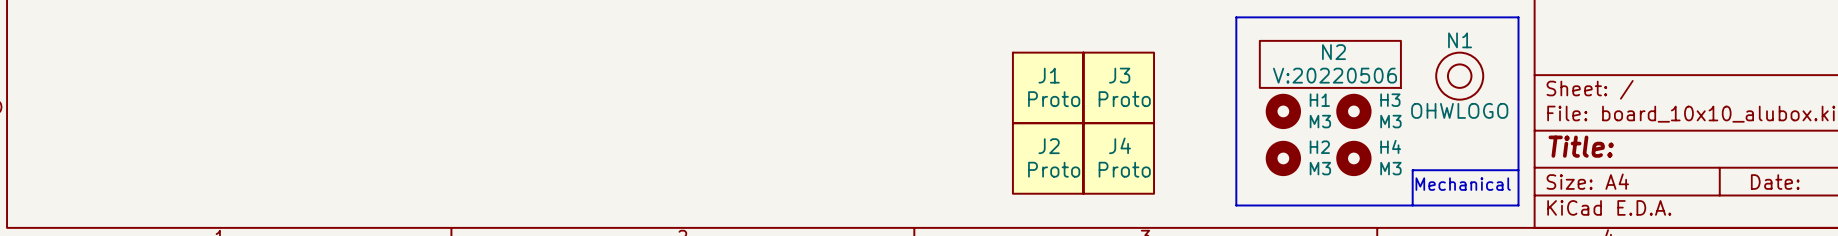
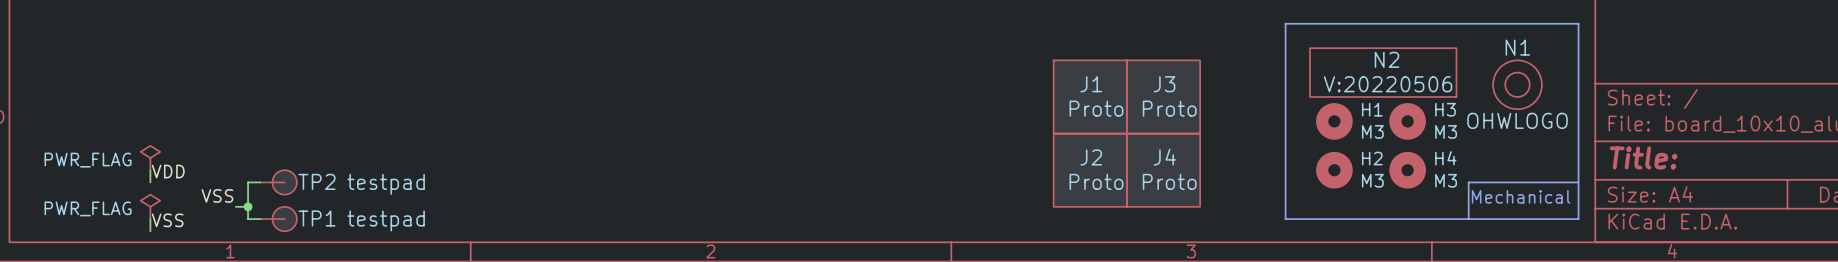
power symbol: none -> PWR_FLAG (150, 158)
wire: none -> (150, 170) (150, 182)
label: none -> VDD (168, 171)
wire: none -> (260, 182) (248, 182) (248, 219) (260, 219)
TP2: none -> testpad (278, 182)
label: none -> VSS (217, 195)
power symbol: none -> PWR_FLAG (150, 206)
wire: none -> (235, 206) (248, 206)
junction: none -> (248, 206)
wire: none -> (150, 219) (150, 231)
TP1: none -> testpad (278, 219)
label: none -> VSS (167, 220)

